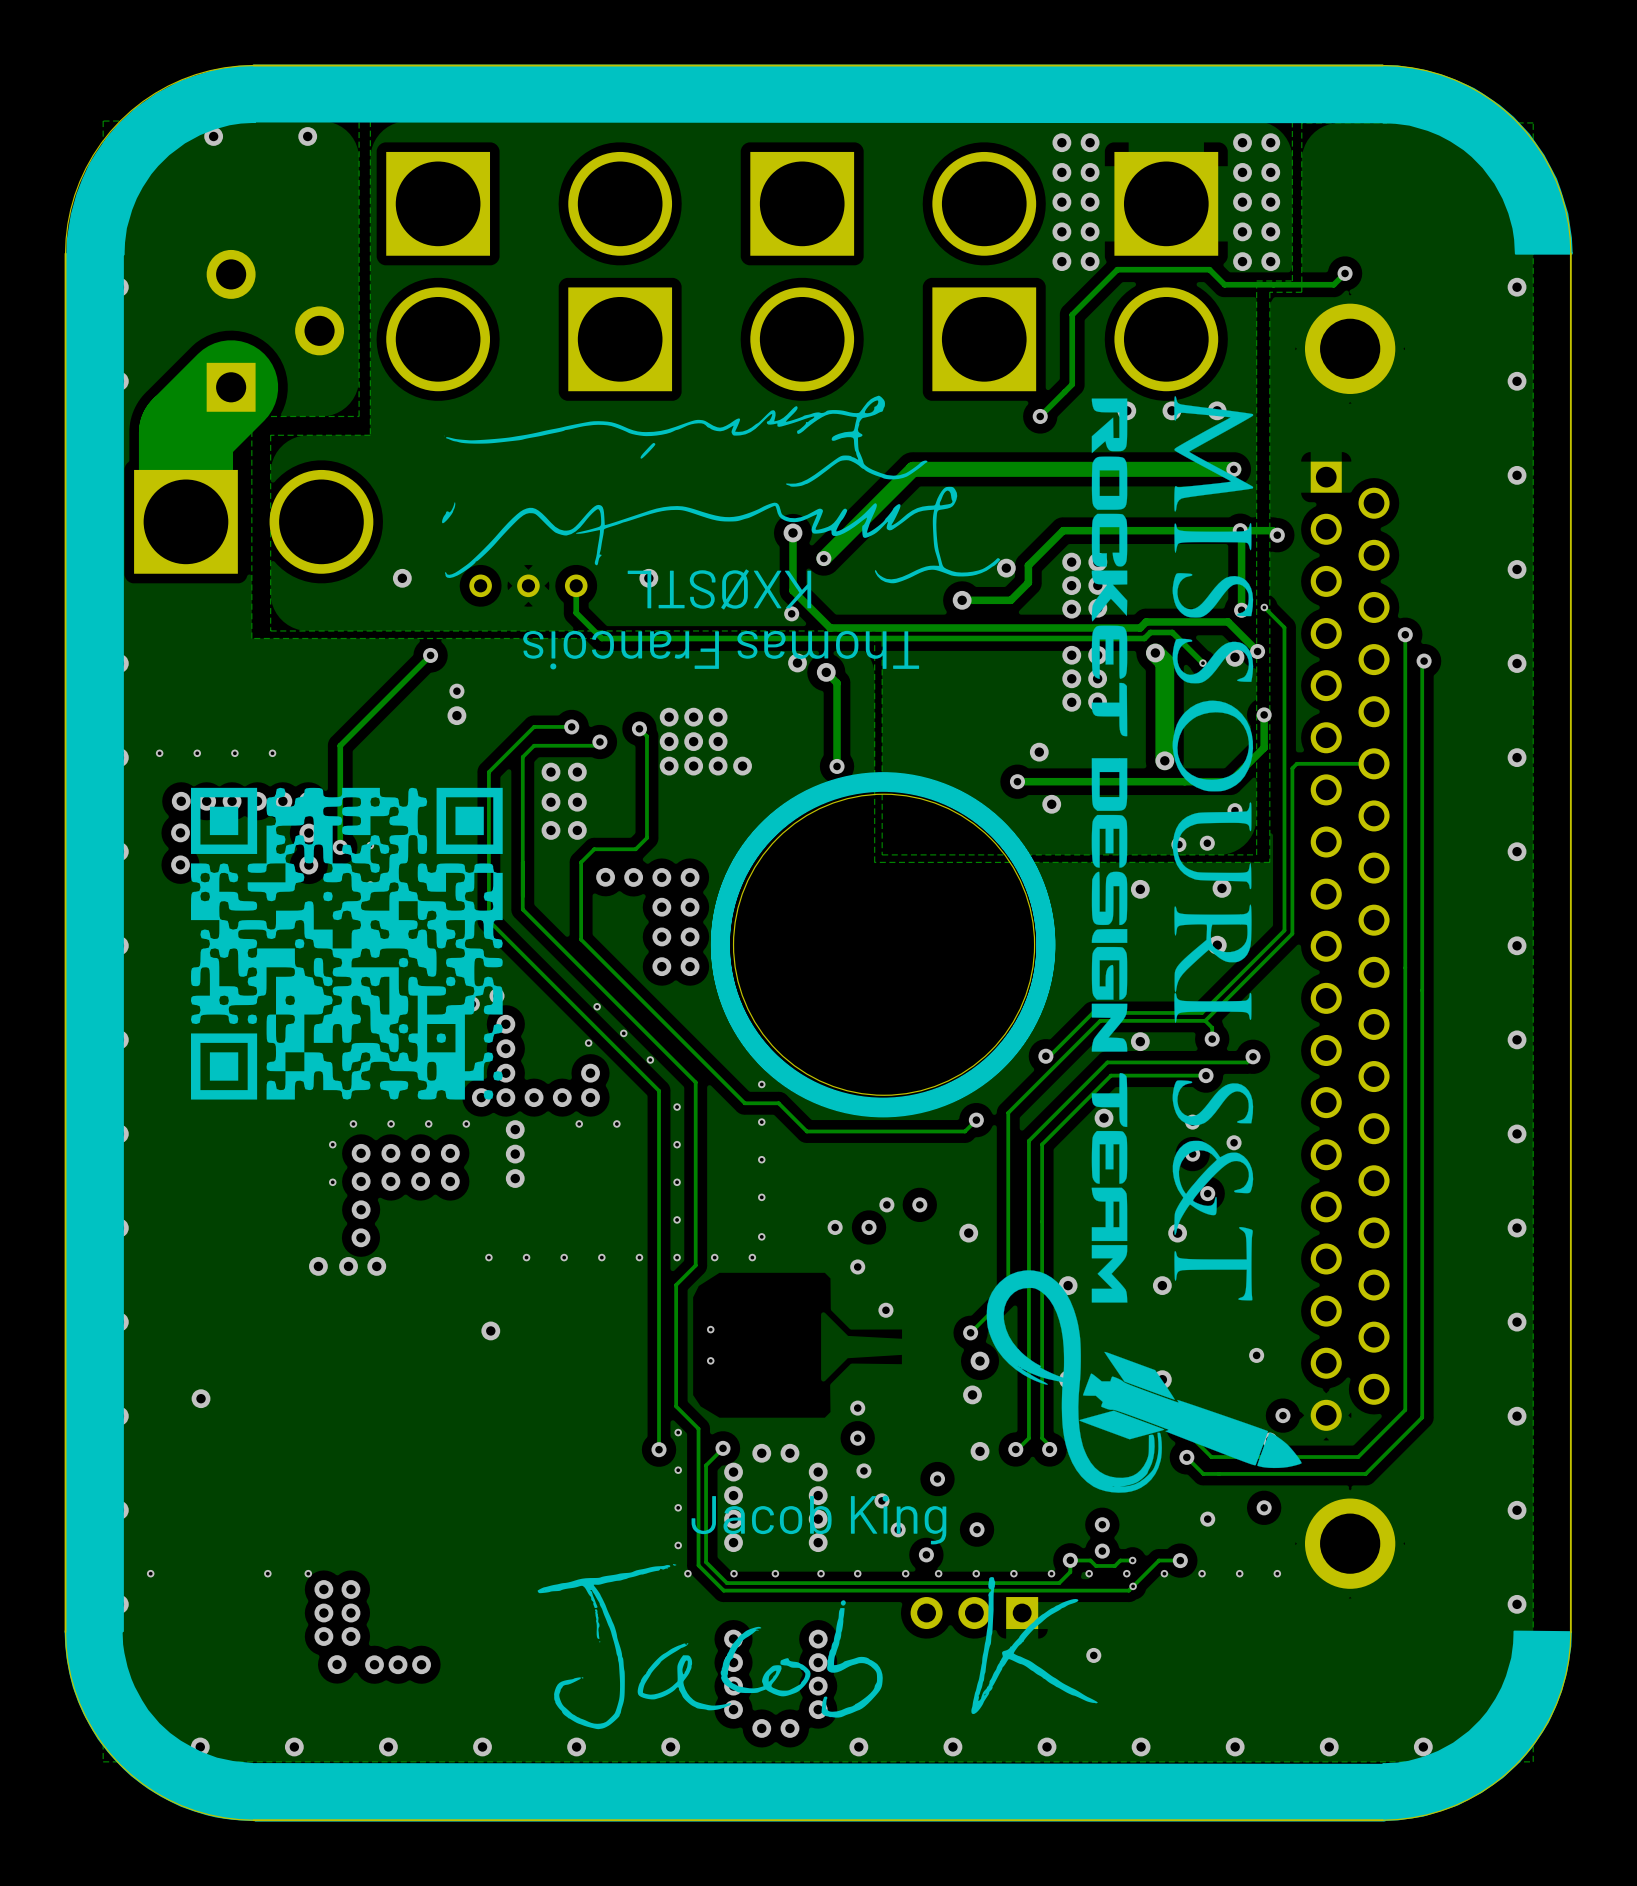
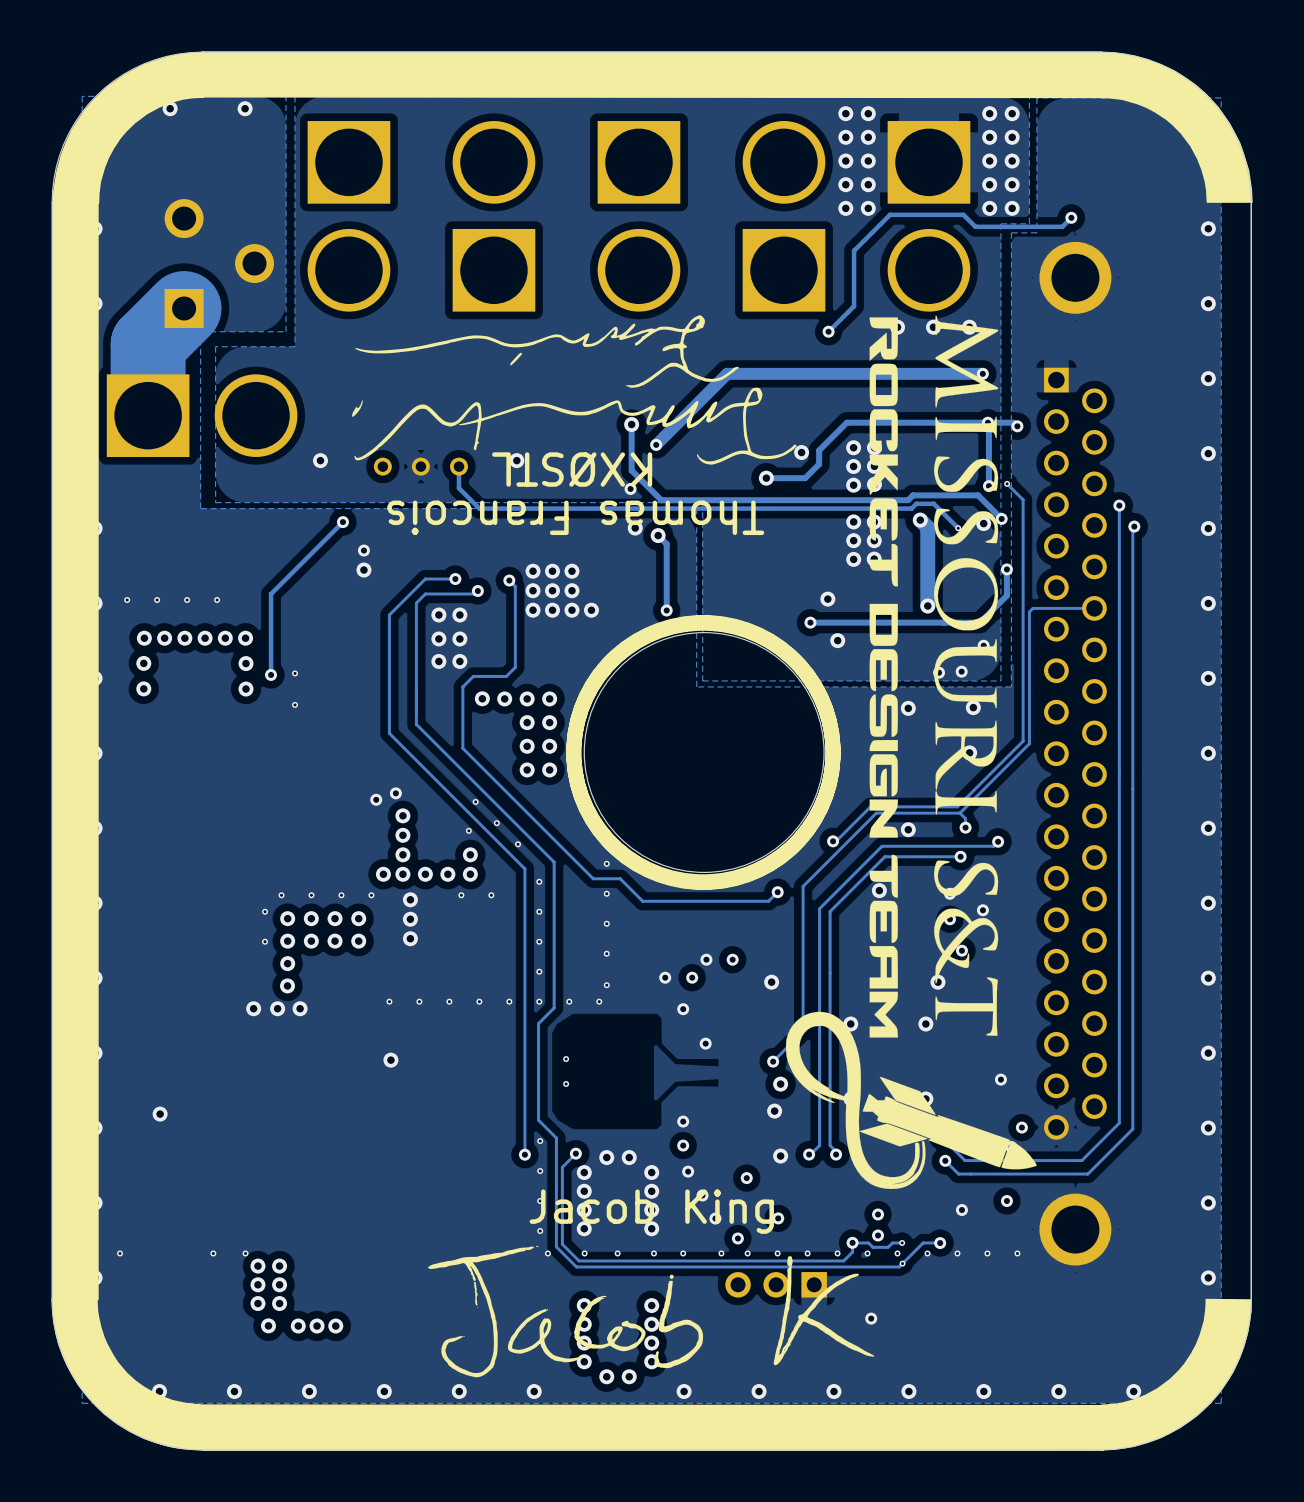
drawing: [191, 787, 503, 1100] -> none

